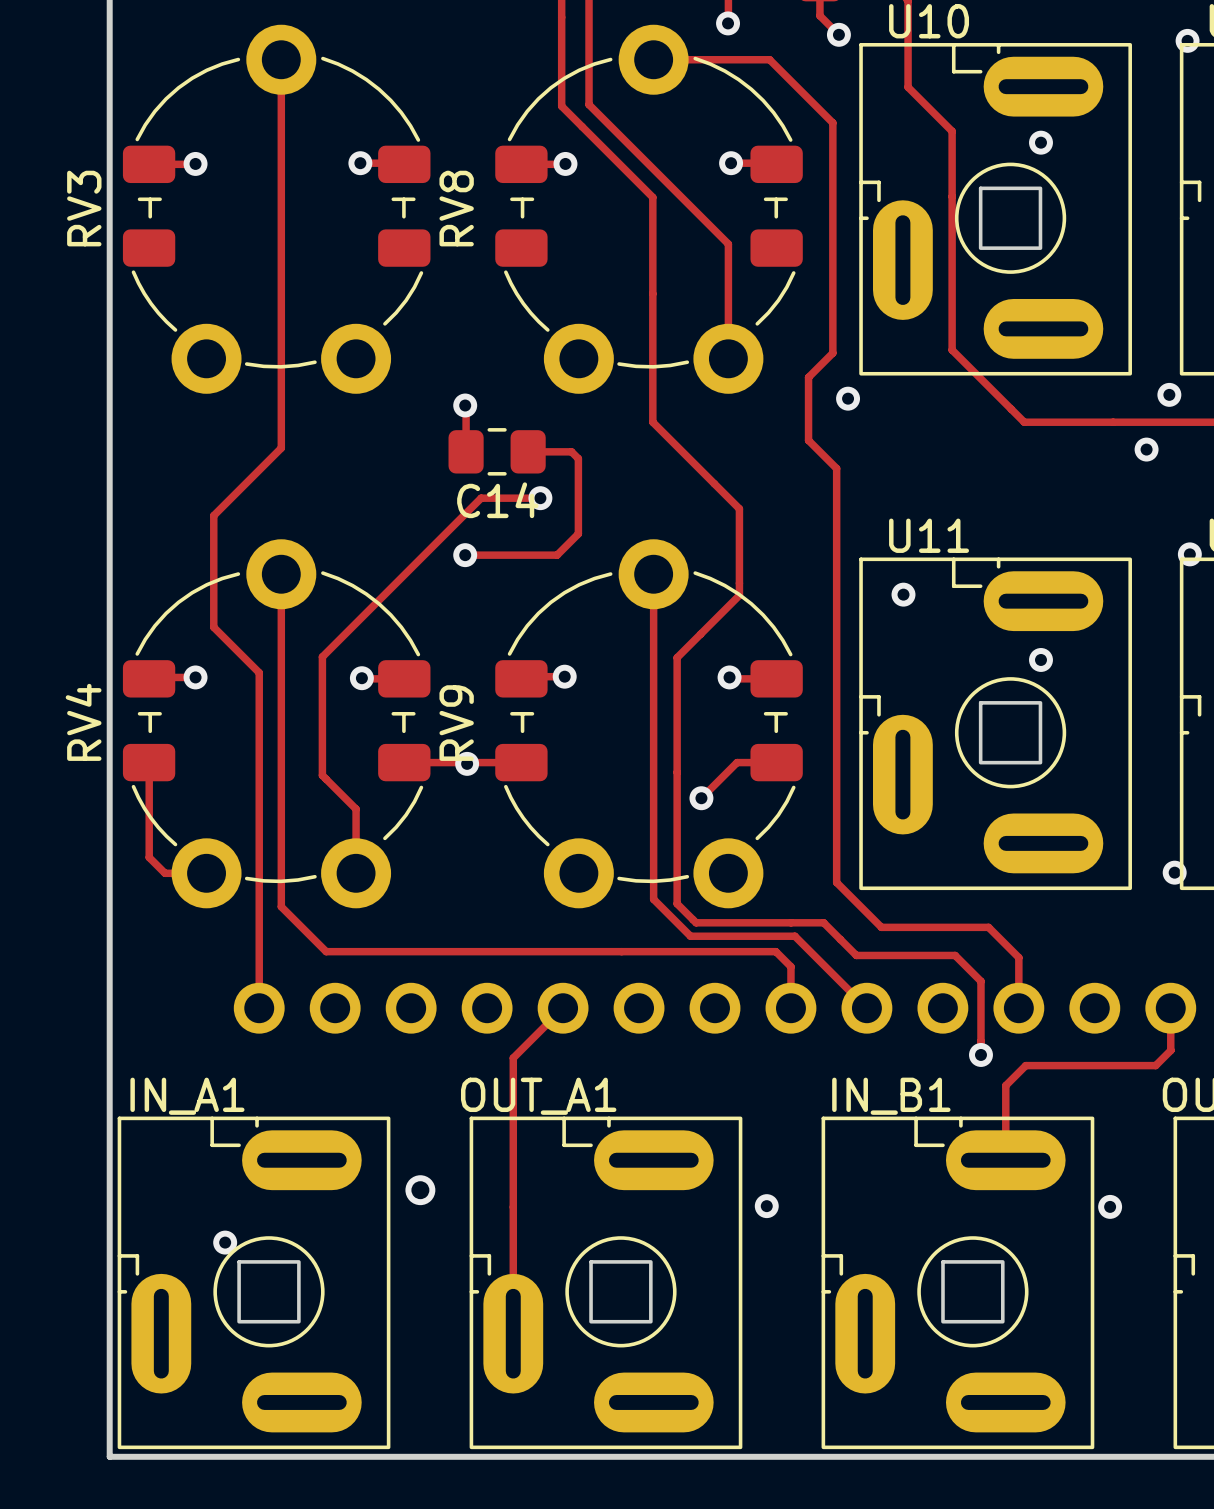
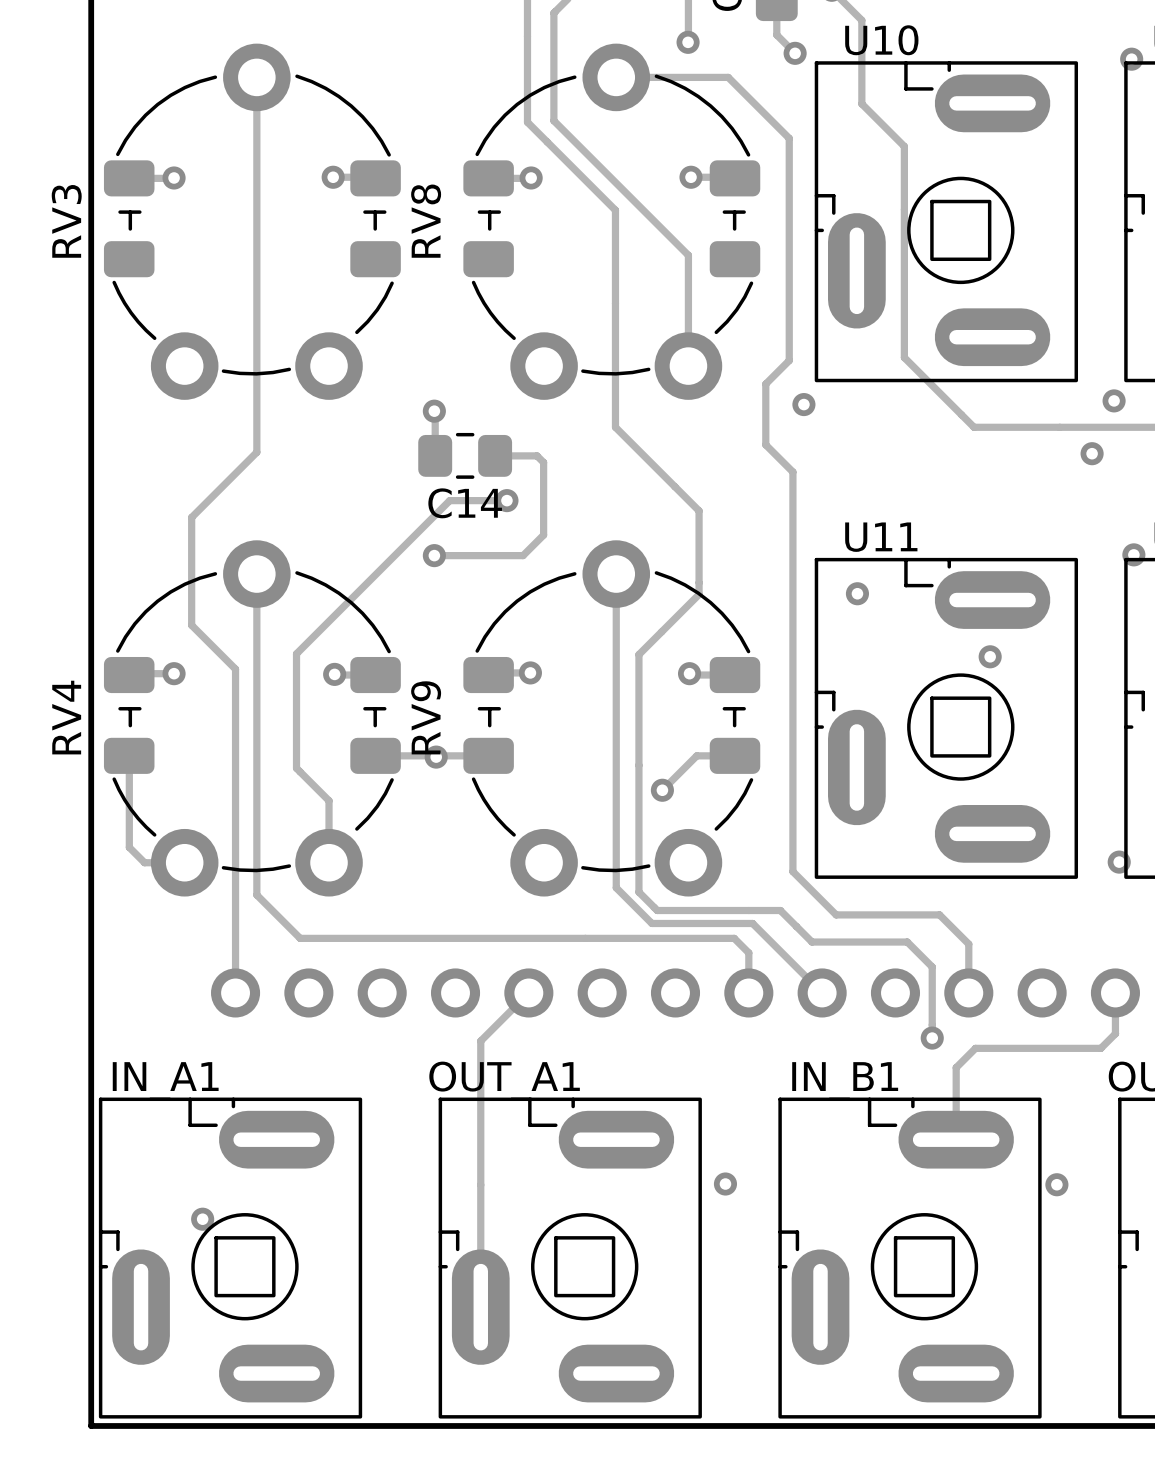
via: (1040, 142) -> none
via: (420, 1190) -> none

